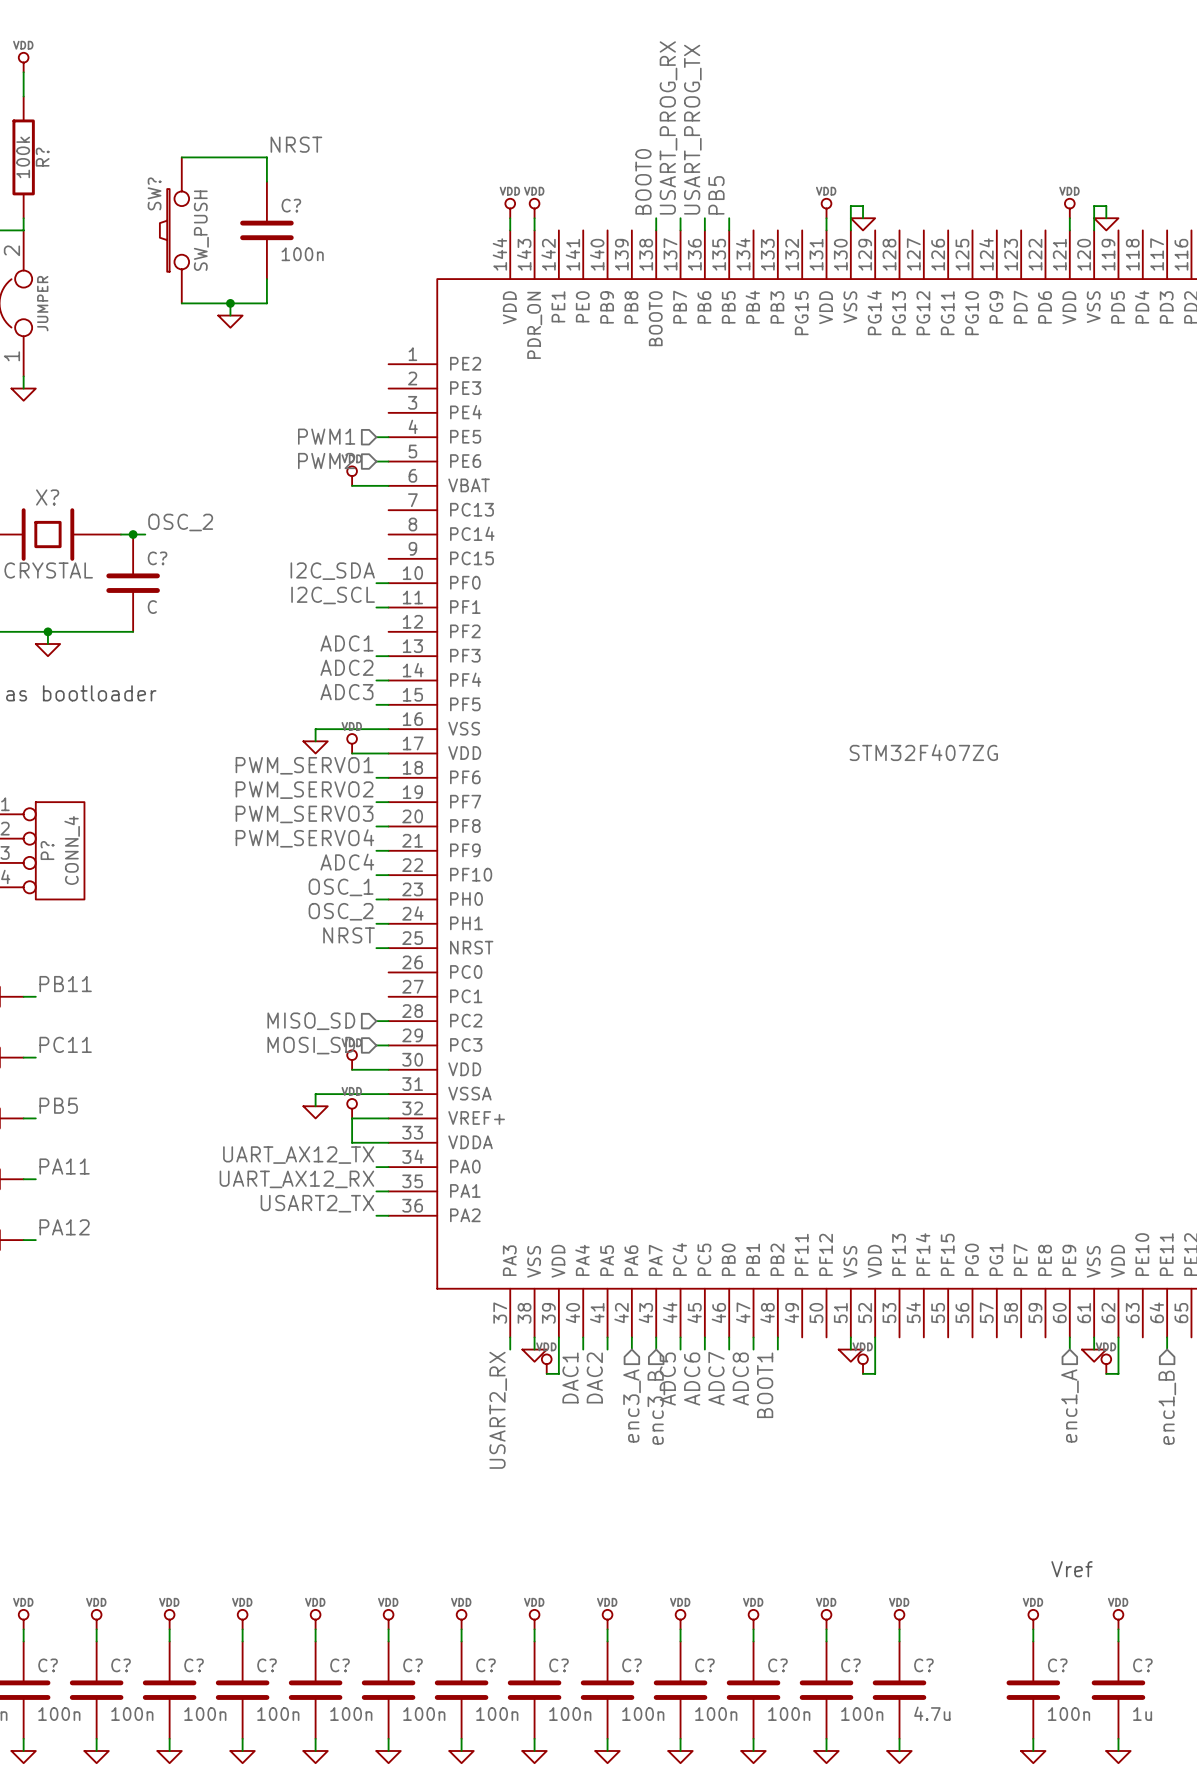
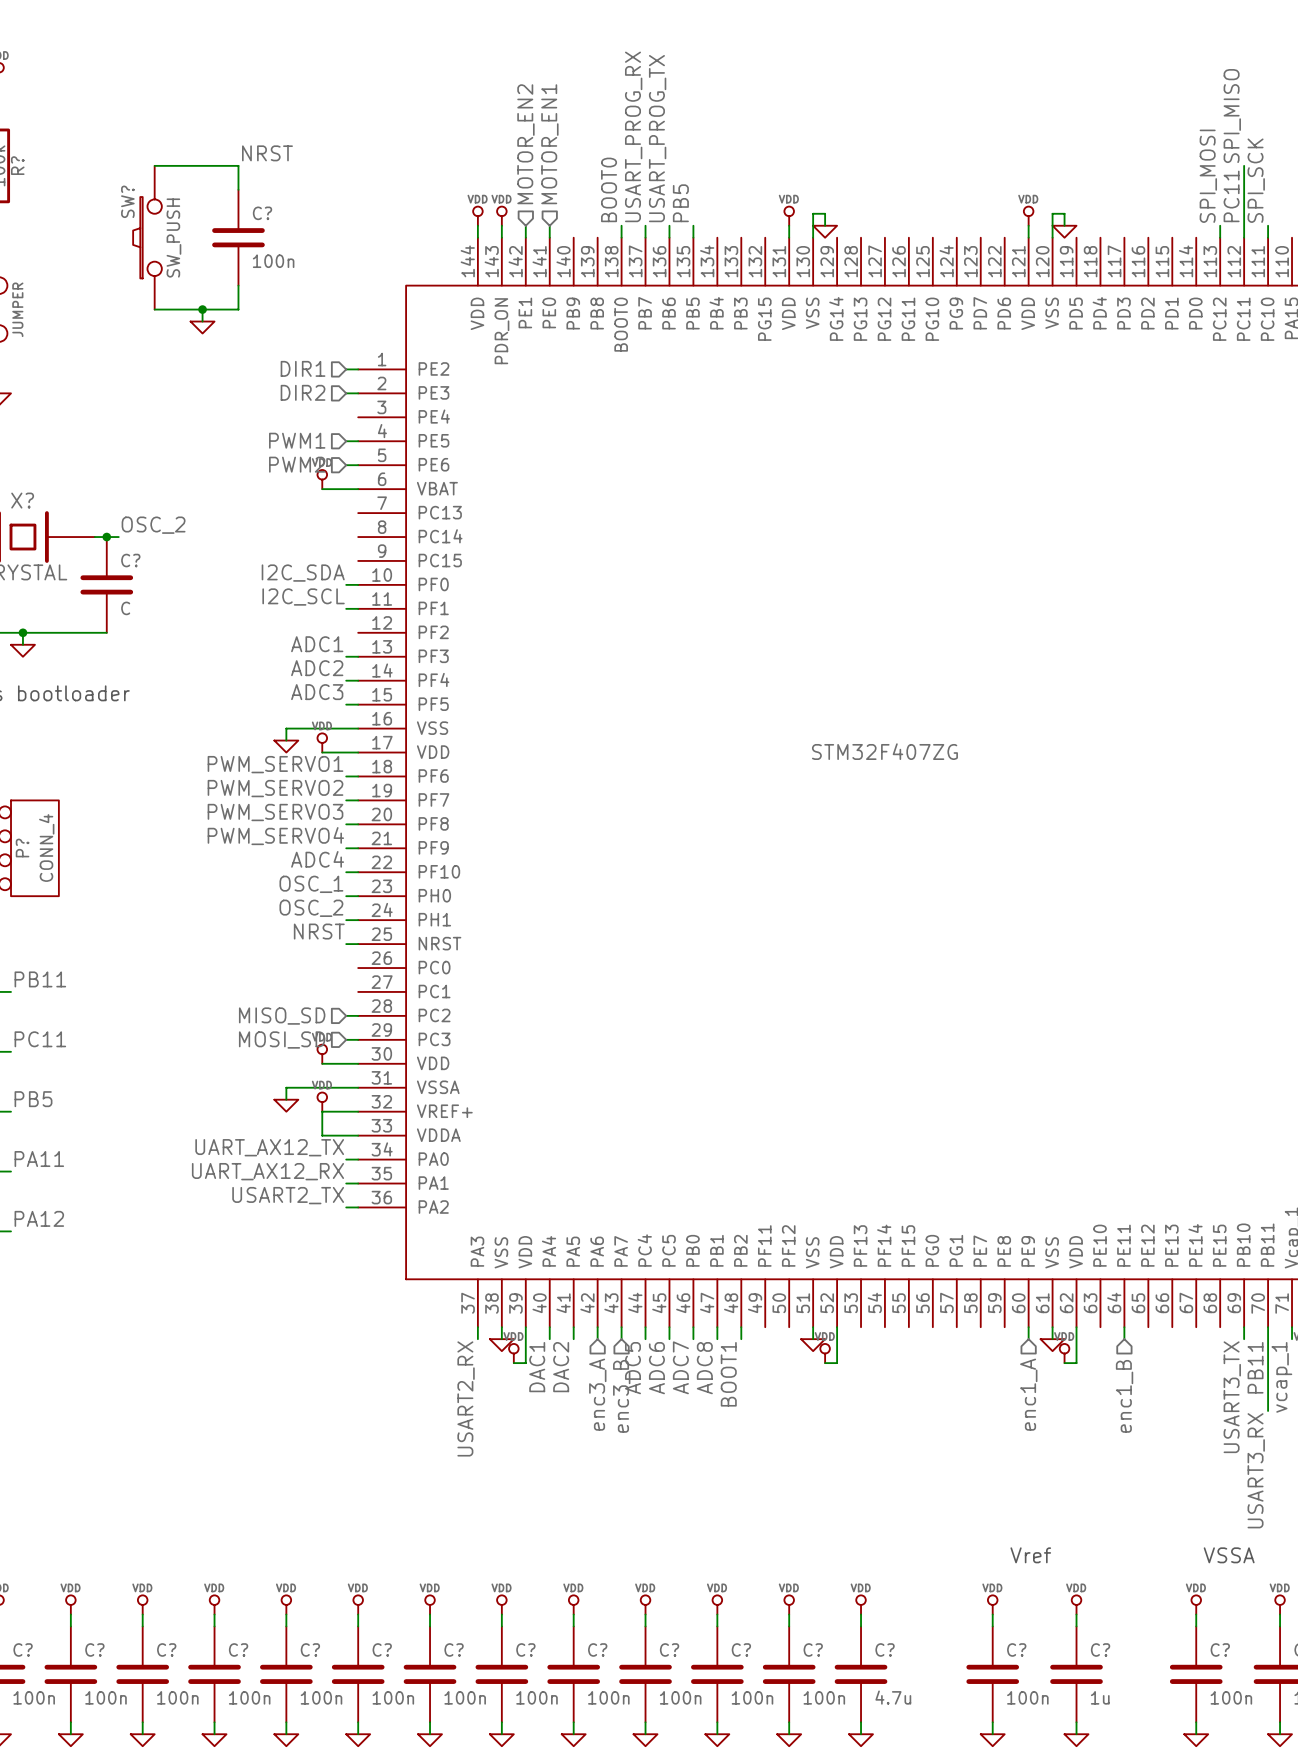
hierarchical label: none -> MOTOR_EN2 (525, 144)
hierarchical label: none -> MOTOR_EN1 (549, 144)
wire: none -> (525, 225) (525, 237)
wire: none -> (549, 225) (549, 237)
hierarchical label: none -> DIR1 (303, 368)
wire: none -> (346, 369) (358, 369)
hierarchical label: none -> DIR2 (303, 392)
wire: none -> (346, 393) (358, 393)

